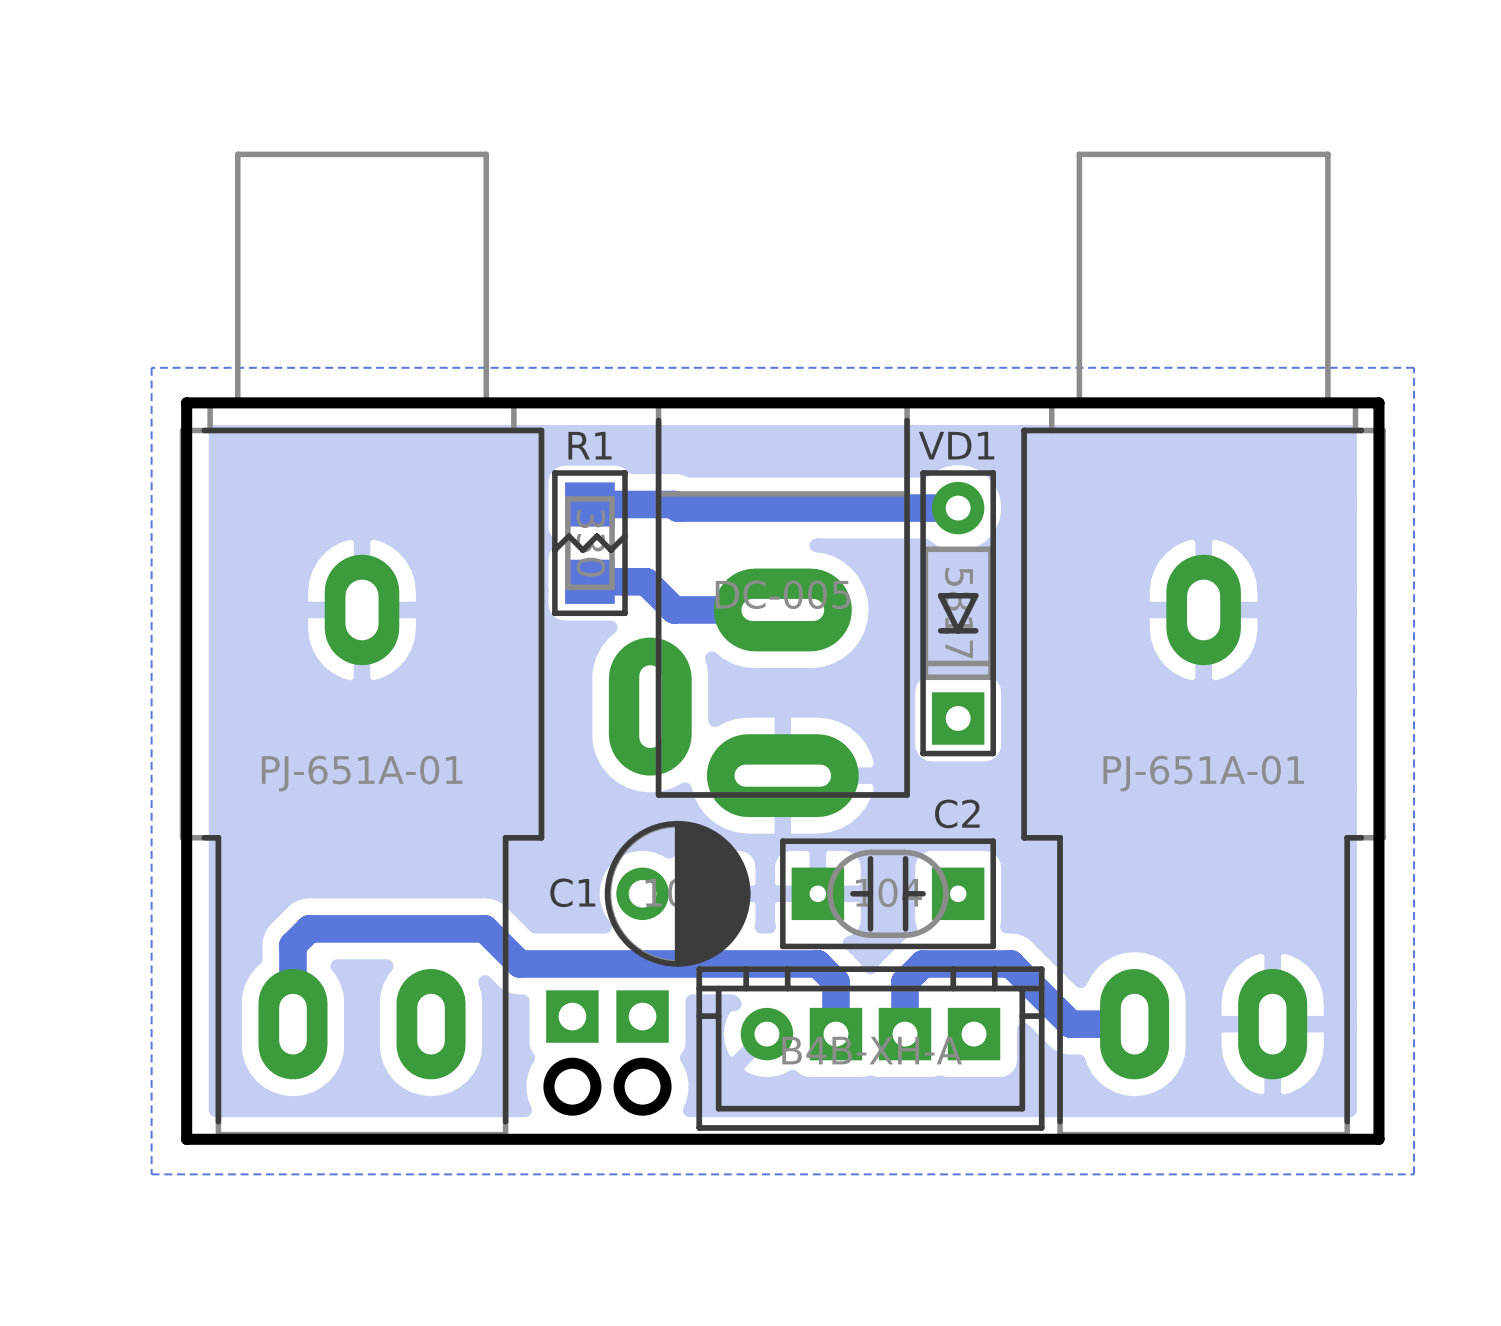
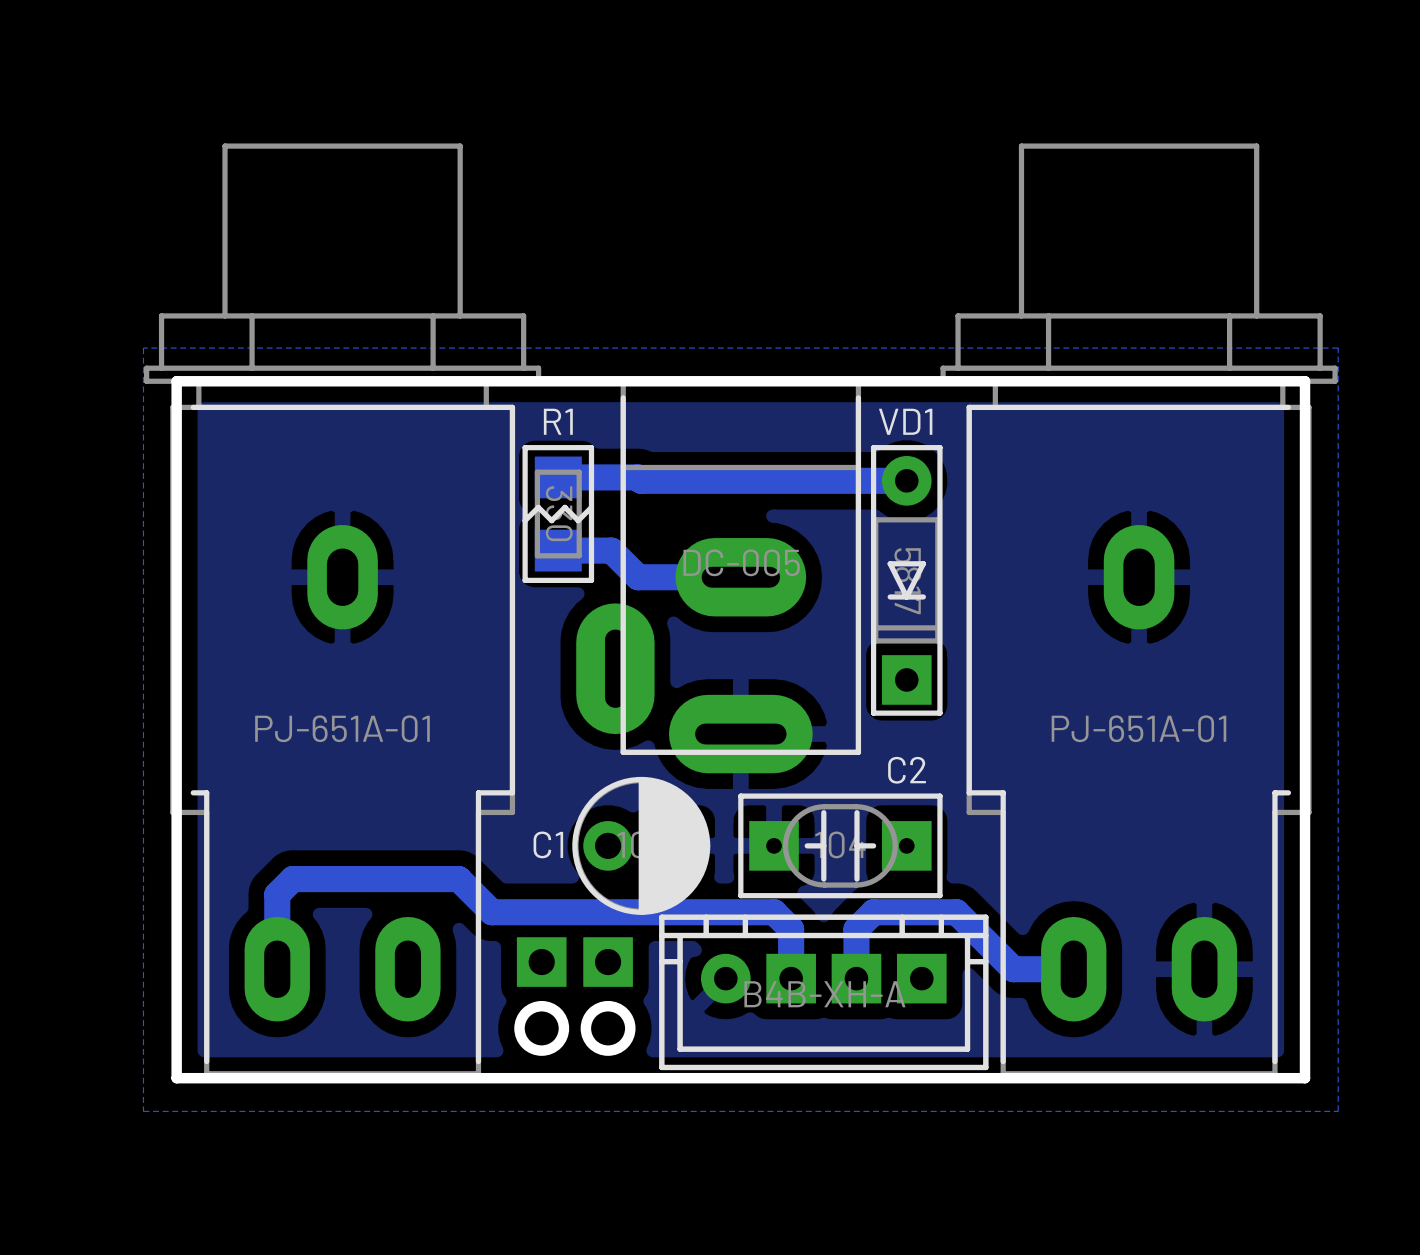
part footprint: [179, 151, 545, 1138] -> [143, 143, 542, 1077]
part footprint: [1021, 151, 1386, 1138] -> [940, 143, 1338, 1077]

